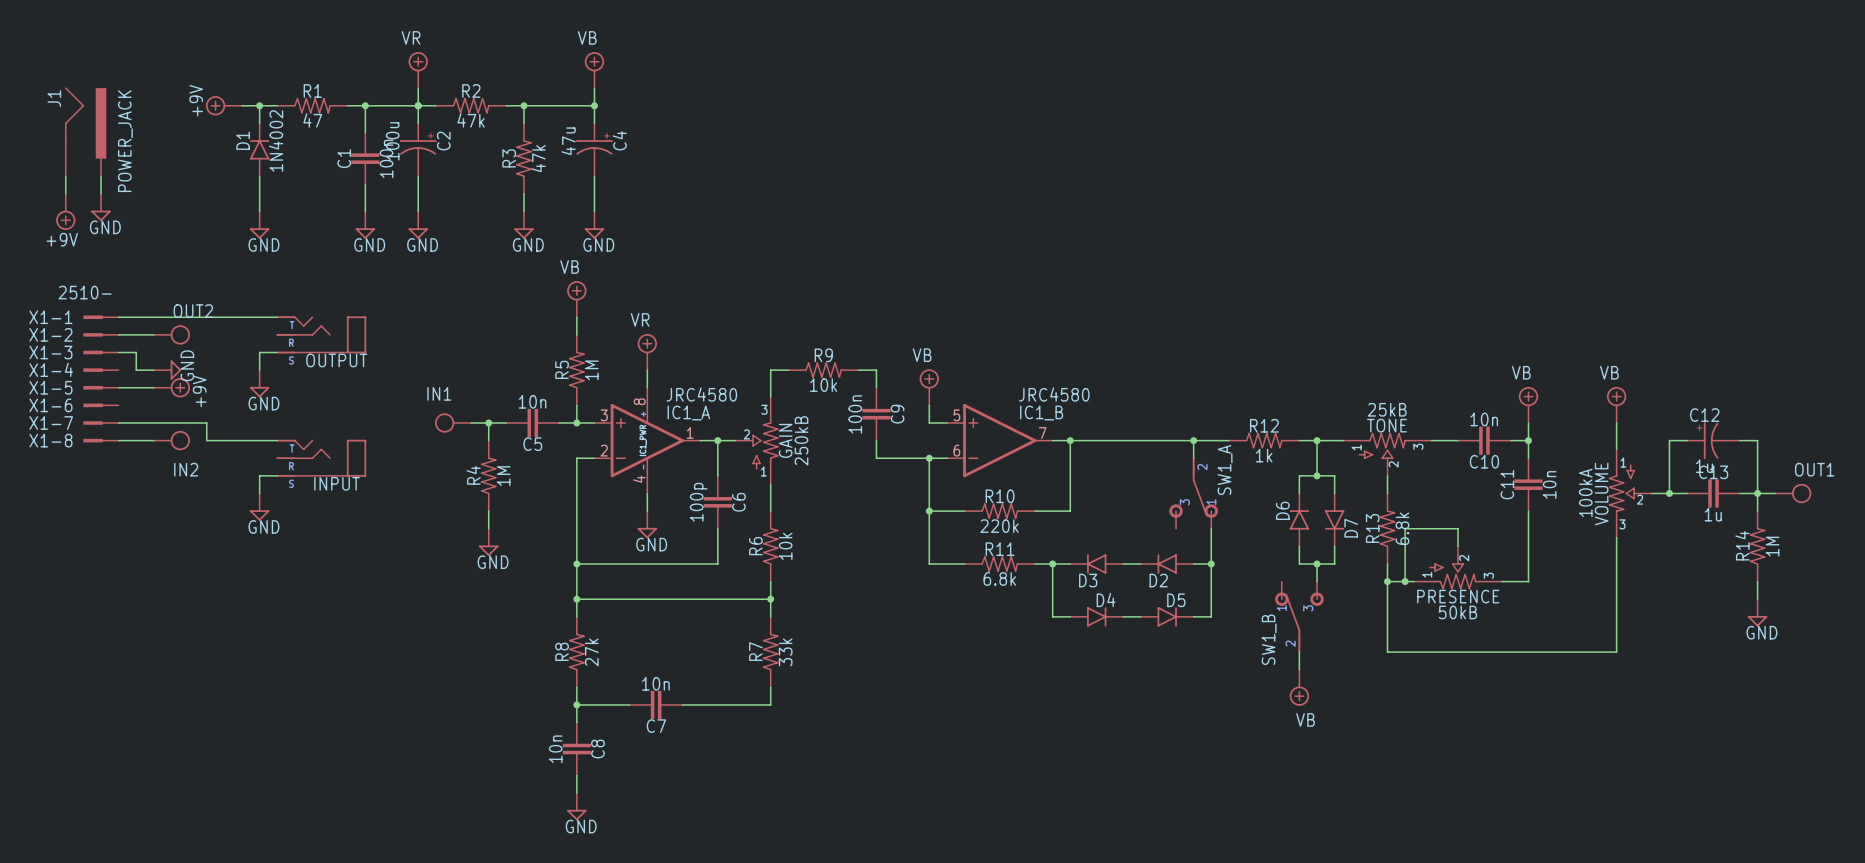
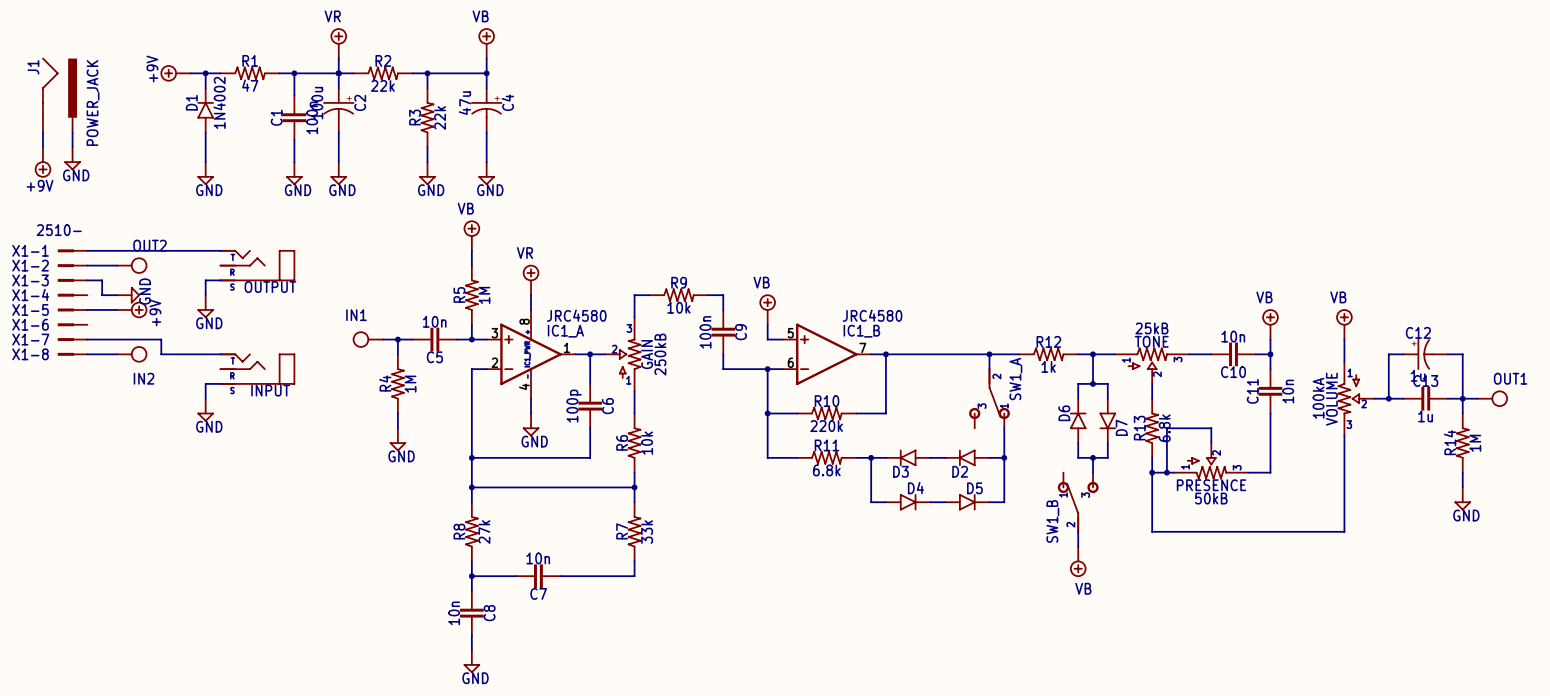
R2 value: 47k (471, 120) -> 22k (382, 85)
R3 value: 47k (538, 158) -> 22k (440, 117)

